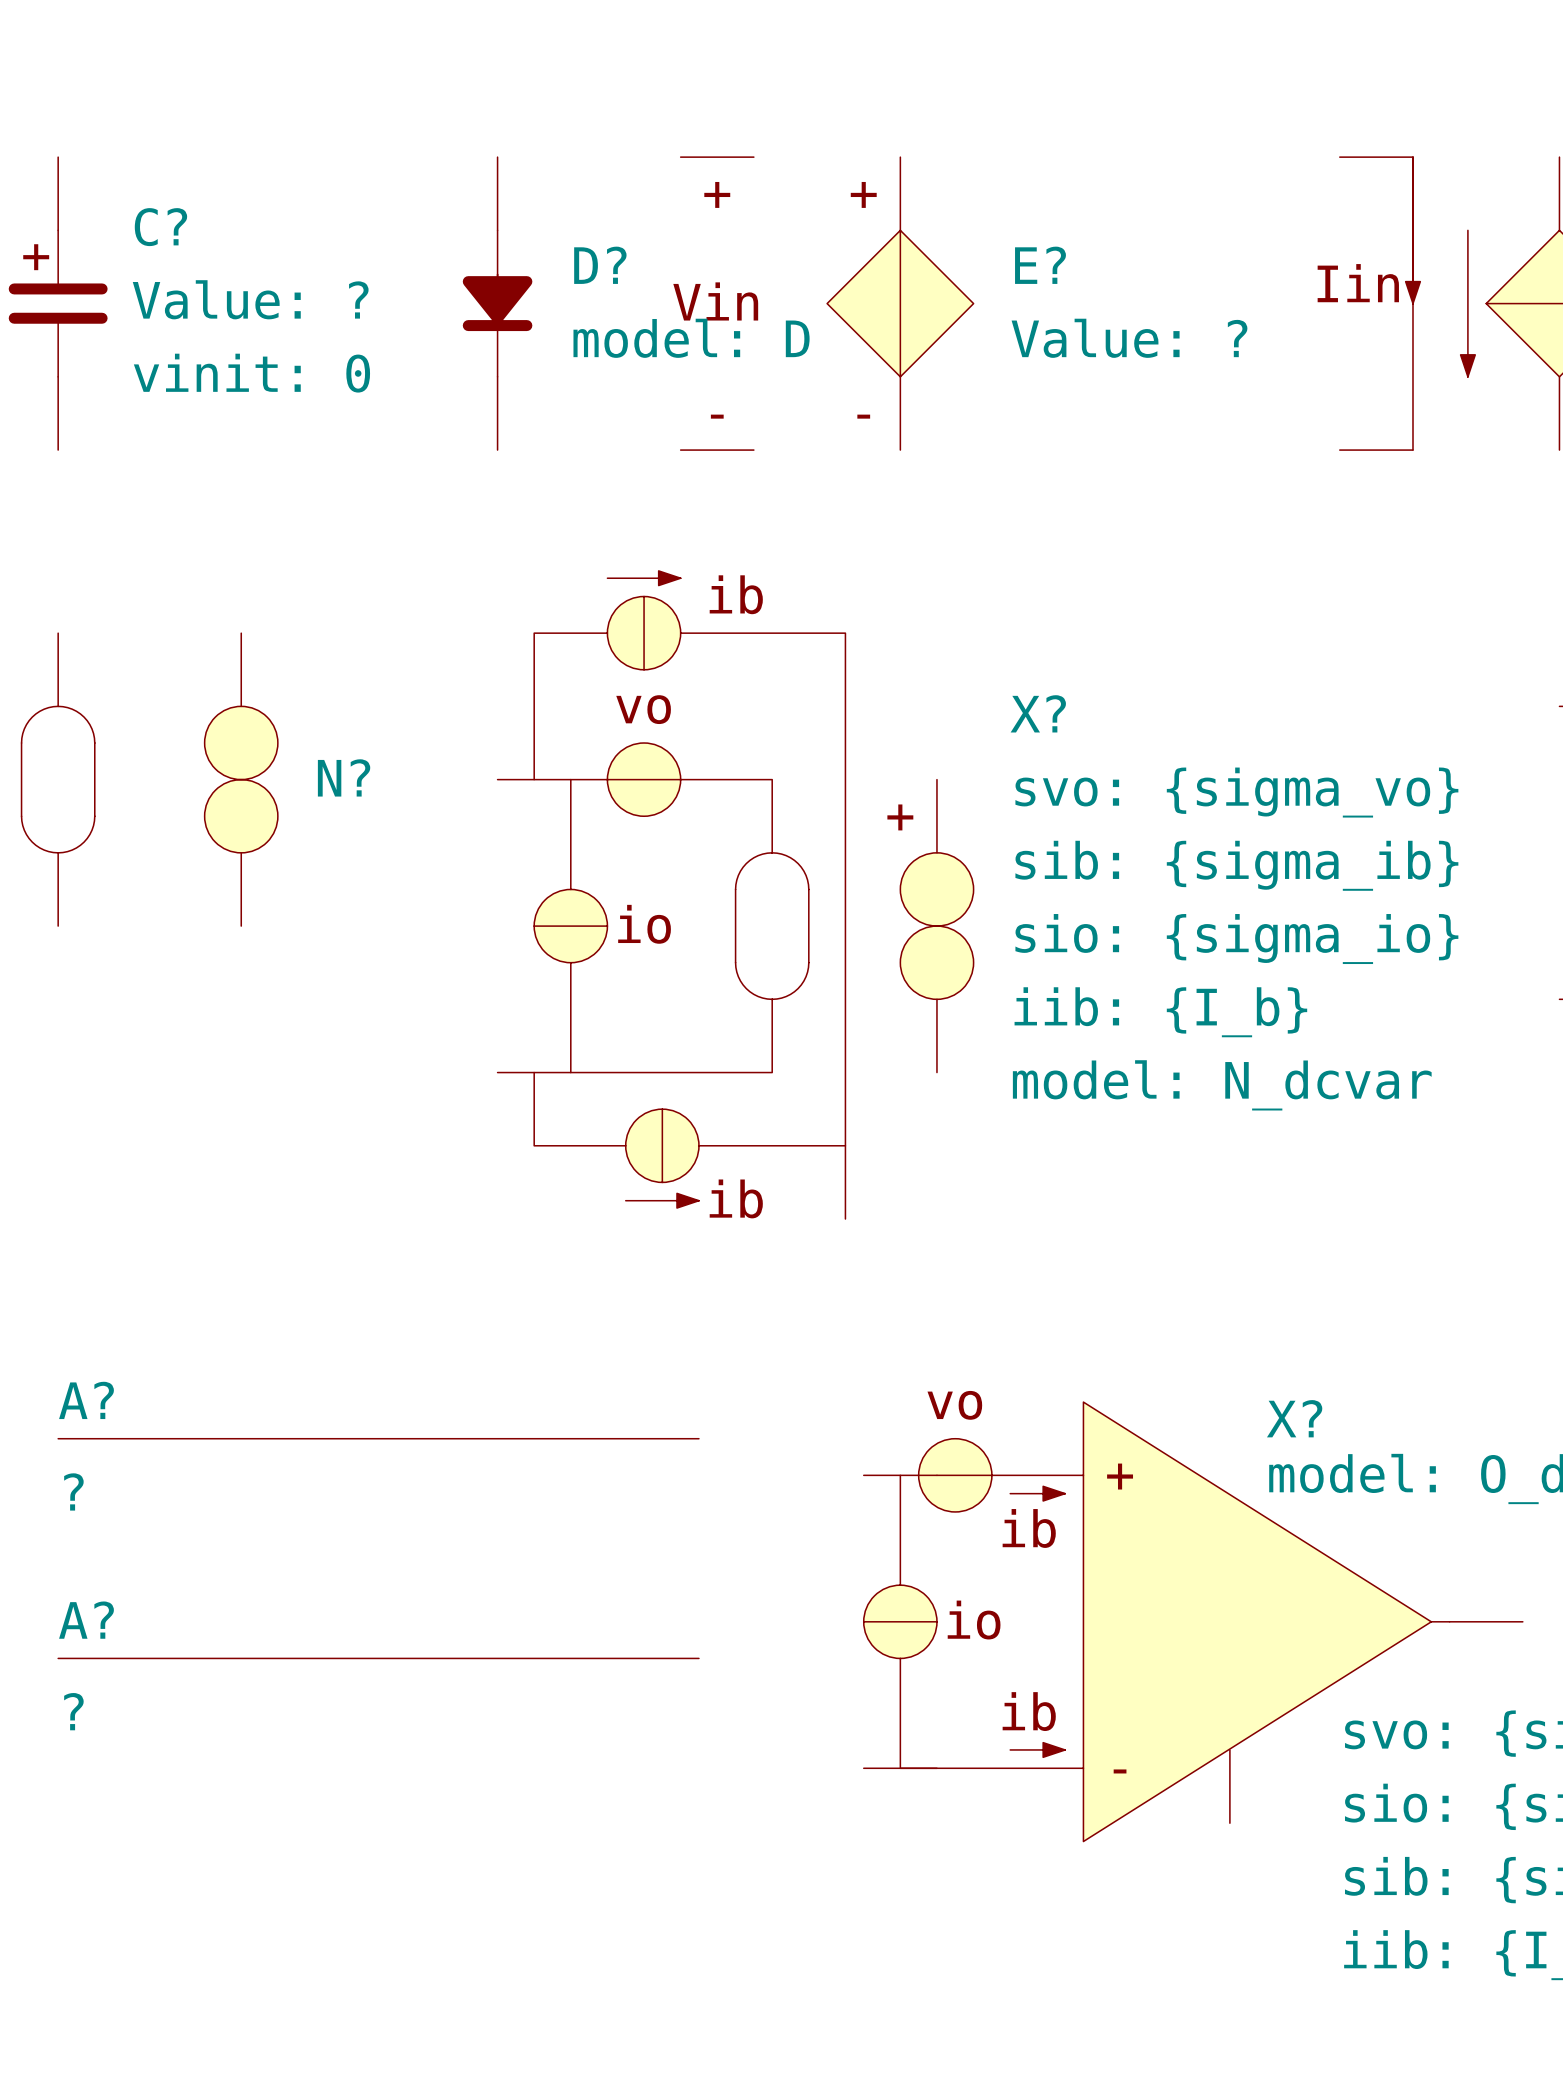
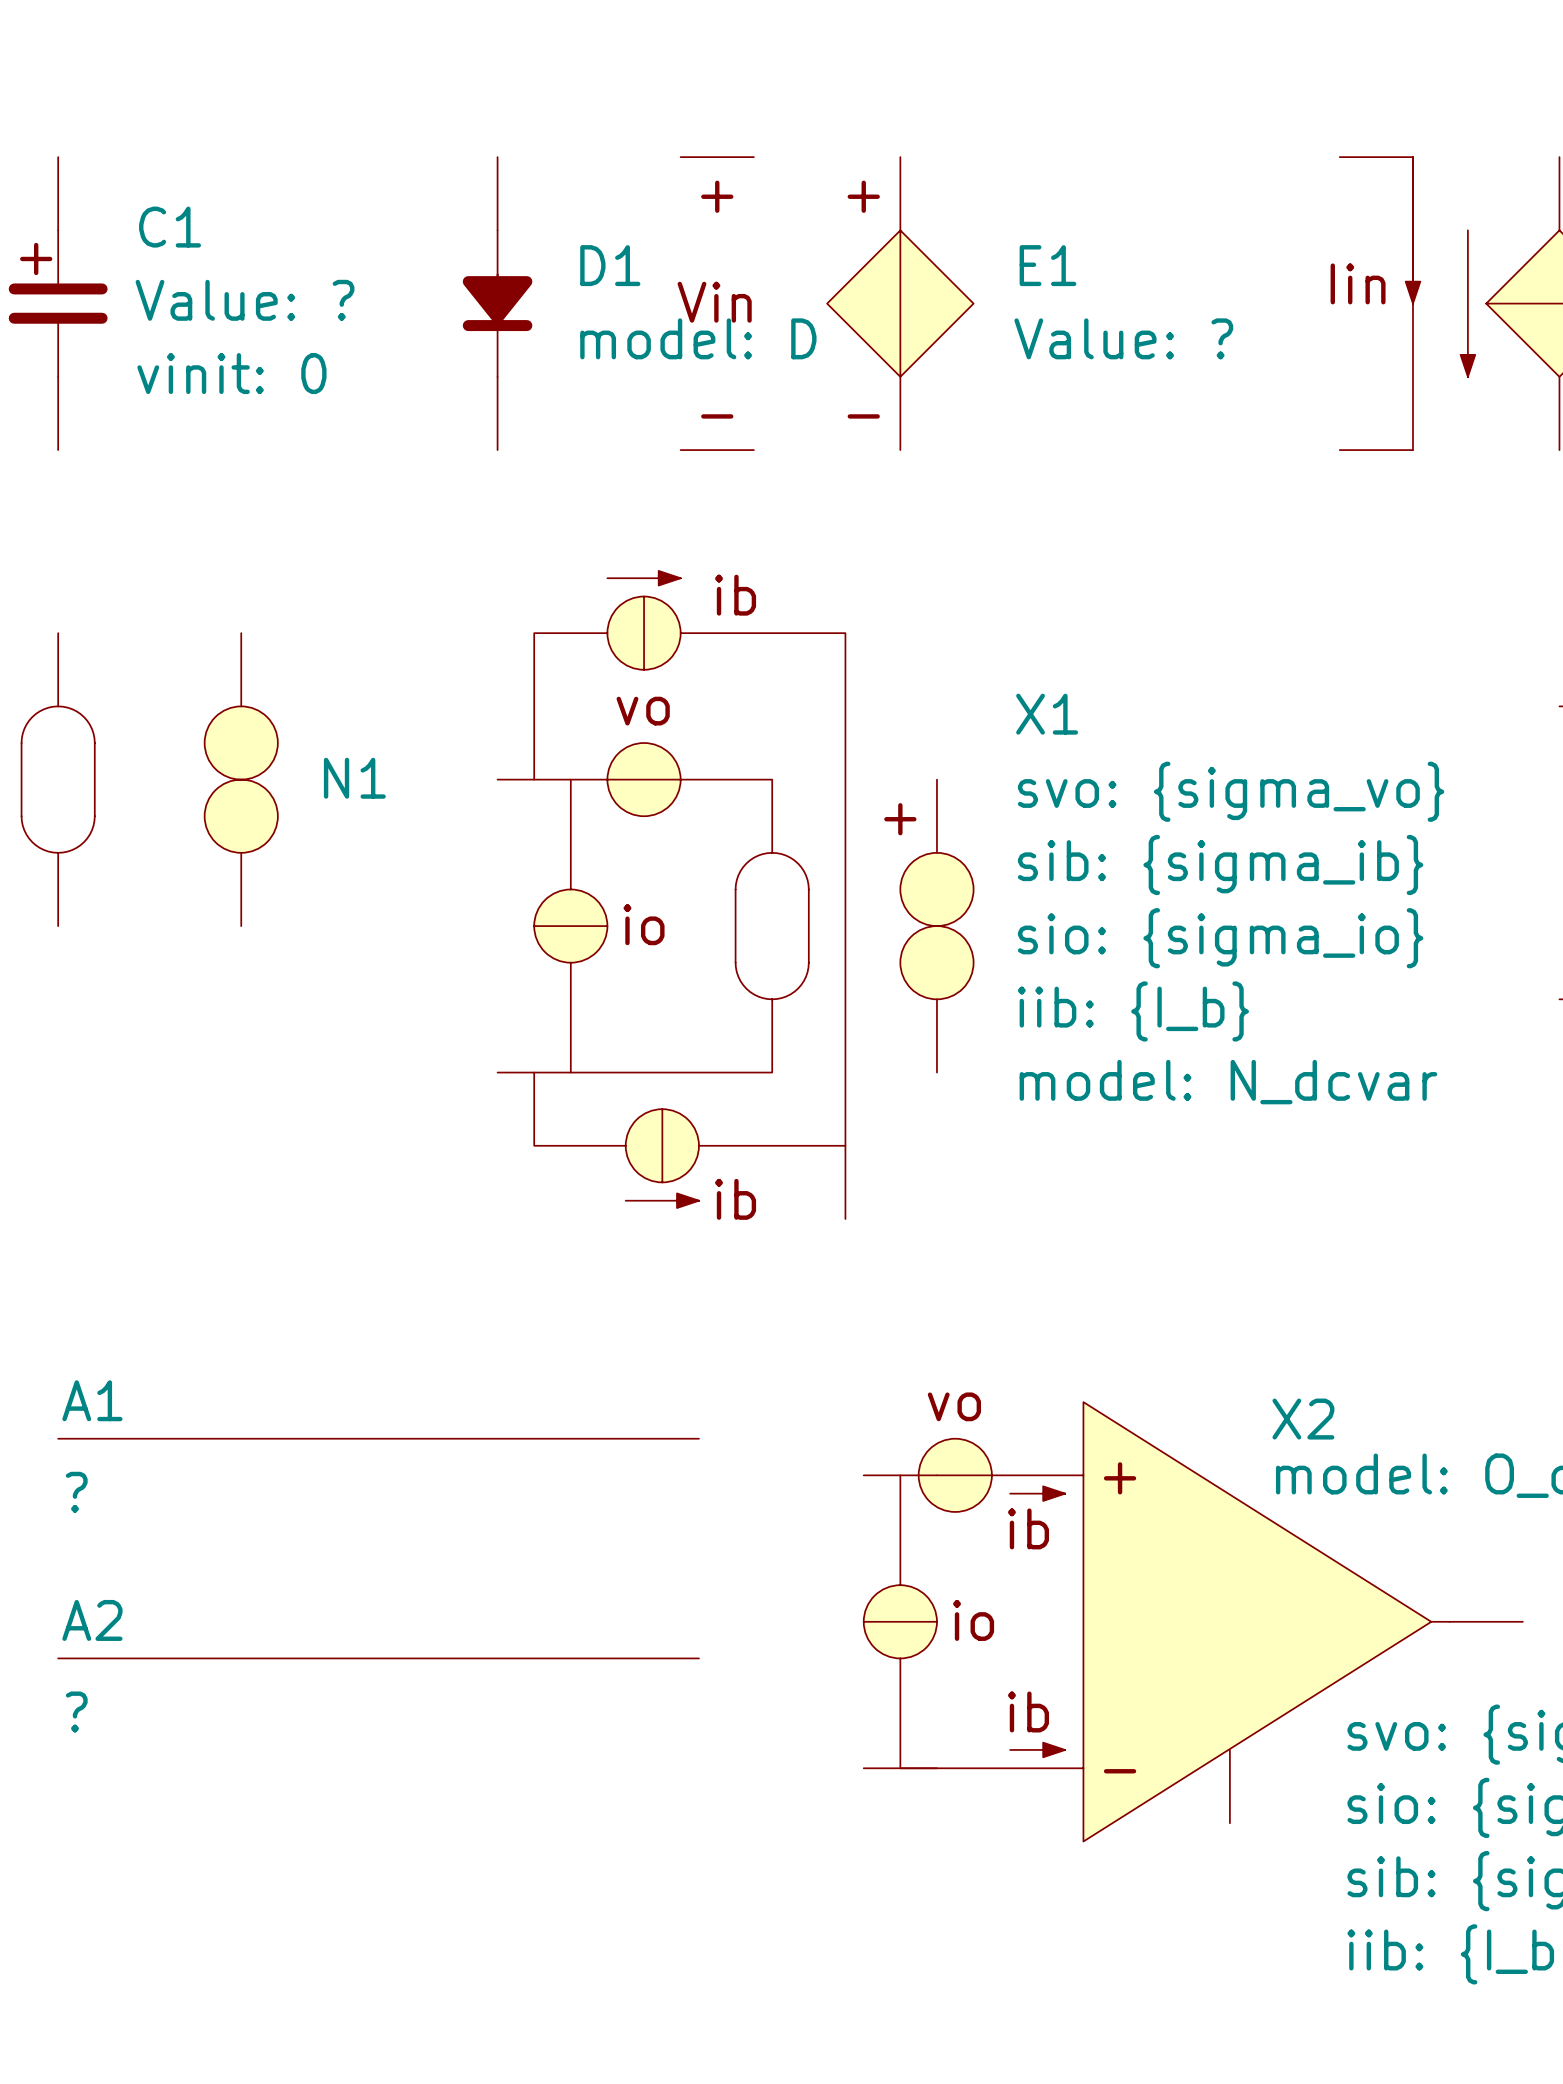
C? name: C? (160, 227) -> C1 (170, 227)
D? name: D? (600, 265) -> D1 (610, 265)
E? name: E? (1040, 265) -> E1 (1047, 265)
X? name: X? (1038, 713) -> X1 (1047, 714)
N? name: N? (344, 777) -> N1 (354, 778)
A? name: A? (86, 1400) -> A1 (92, 1400)
X? name: X? (1294, 1418) -> X2 (1303, 1419)
A? name: A? (86, 1620) -> A2 (92, 1620)

